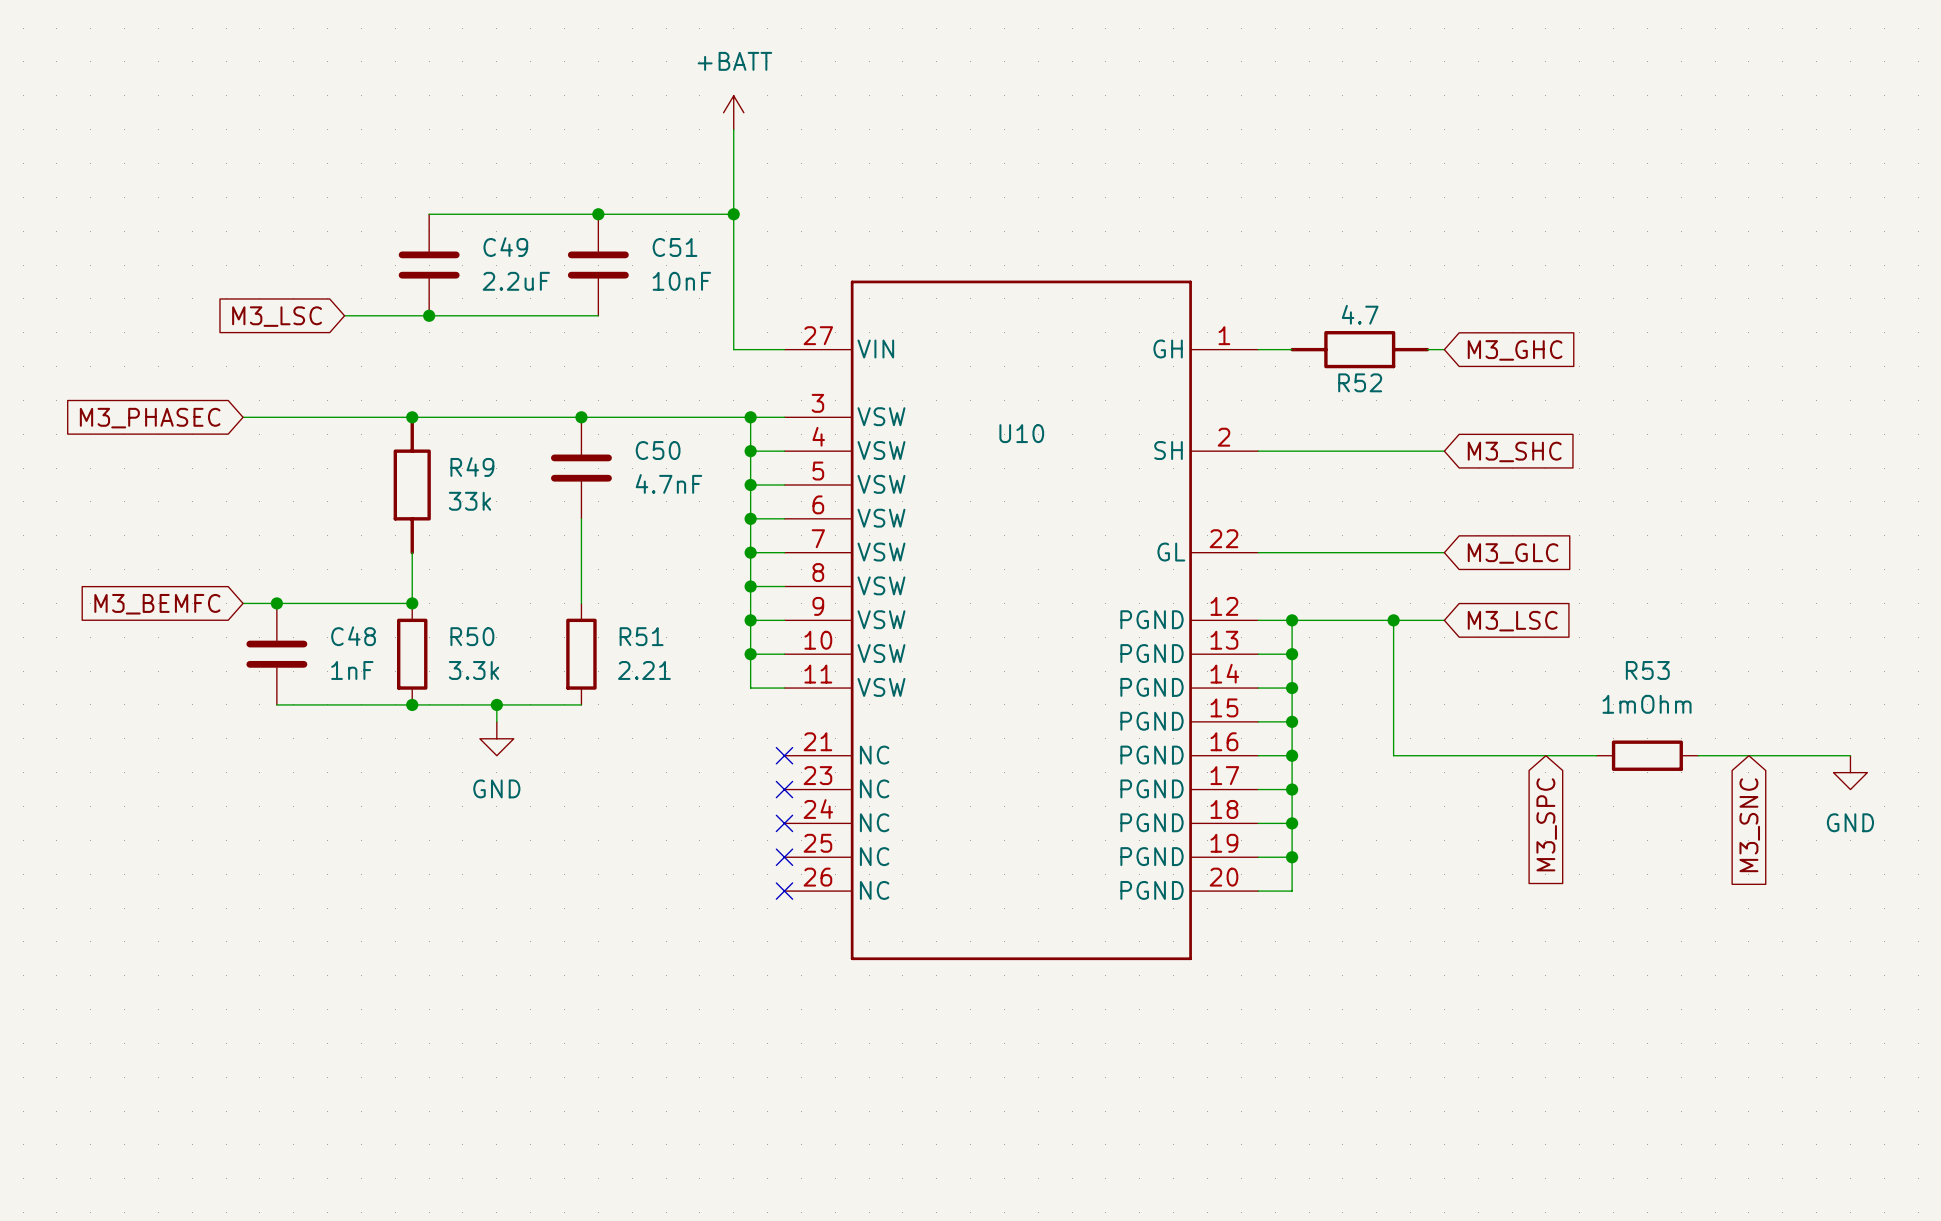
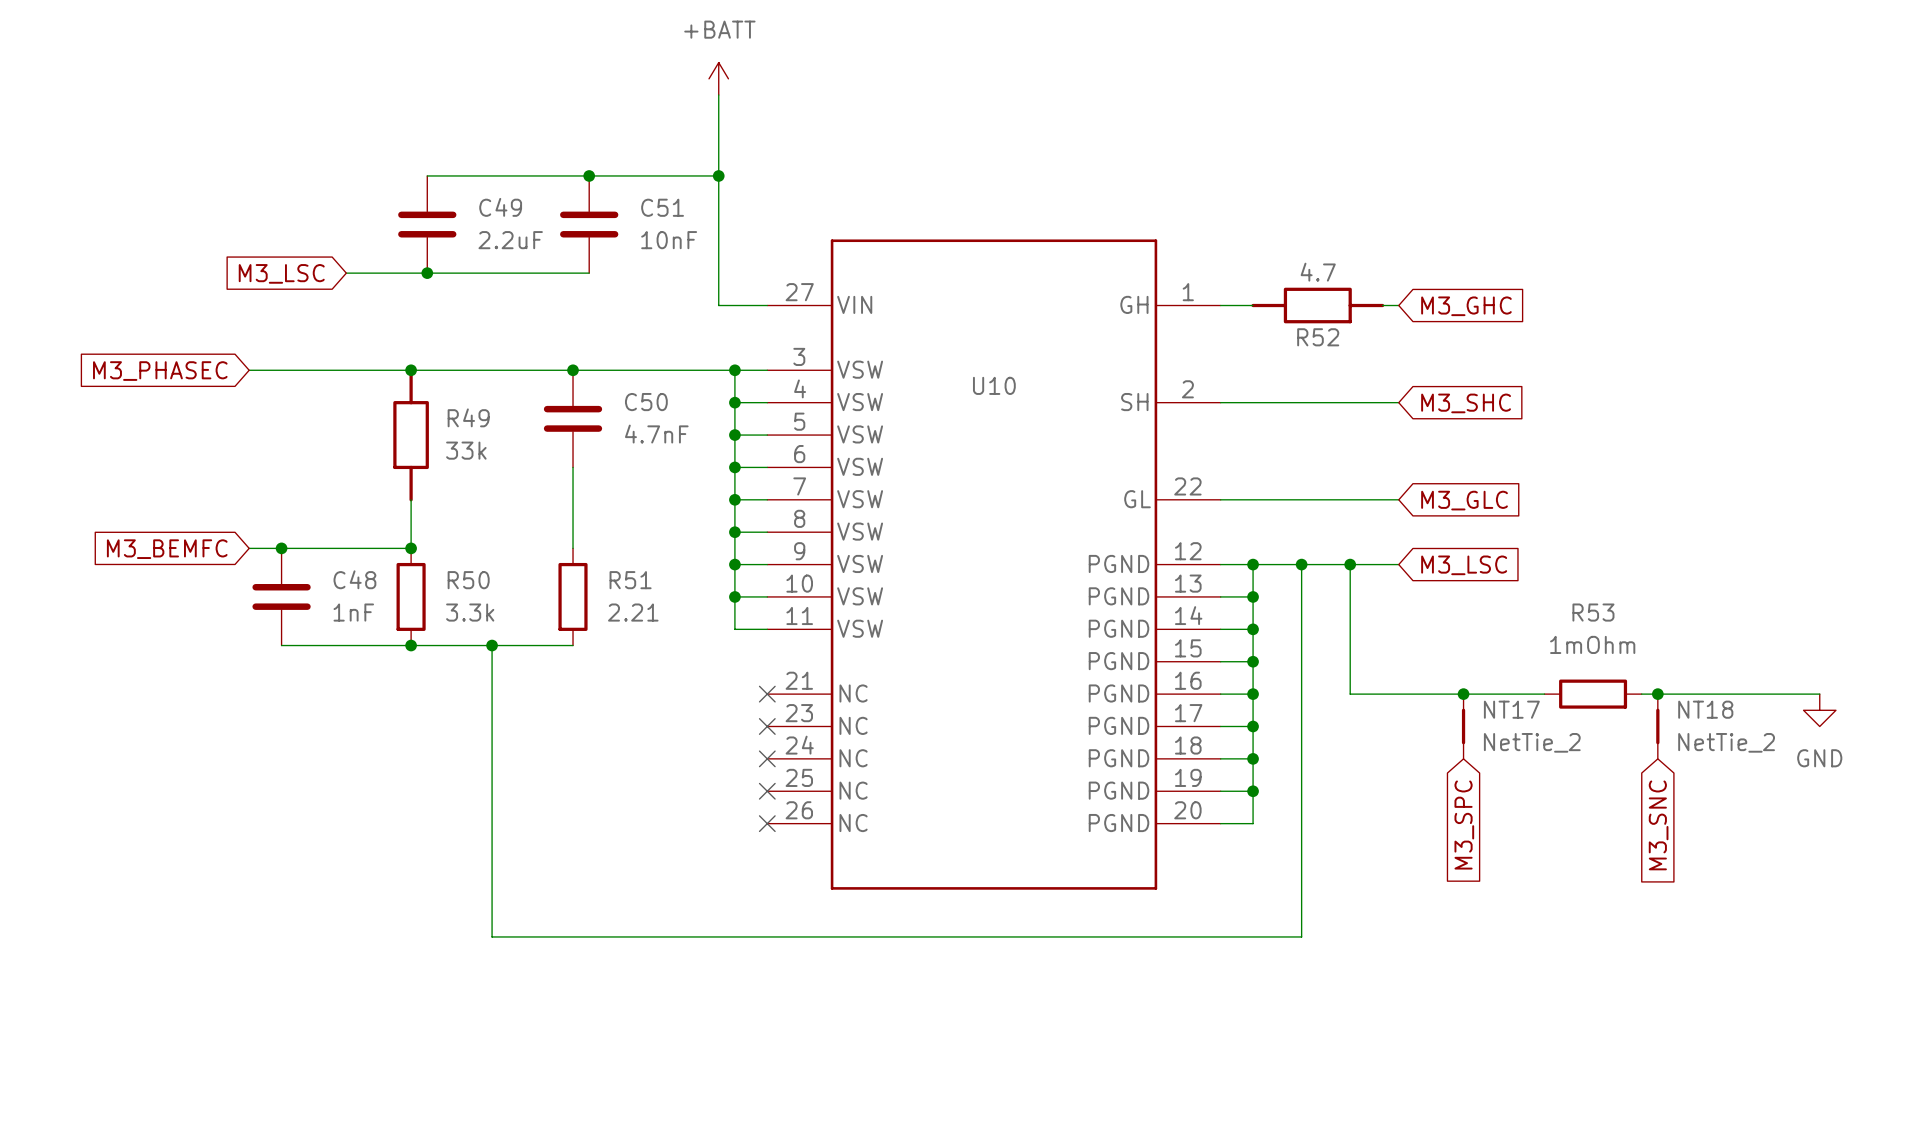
wire: none -> (1301, 564) (1301, 936) (492, 936) (492, 661)
junction: none -> (1301, 564)
power symbol: GND (496, 738) -> none
junction: none -> (1463, 694)
junction: none -> (1657, 694)
wire: none -> (1787, 694) (1819, 694)
power symbol position: GND (1850, 772) -> GND (1819, 710)
NT17: none -> NetTie_2 (1463, 726)
NT18: none -> NetTie_2 (1657, 726)
global label position: M3_SPC (1546, 824) -> M3_SPC (1464, 825)
global label position: M3_SNC (1749, 825) -> M3_SNC (1658, 825)

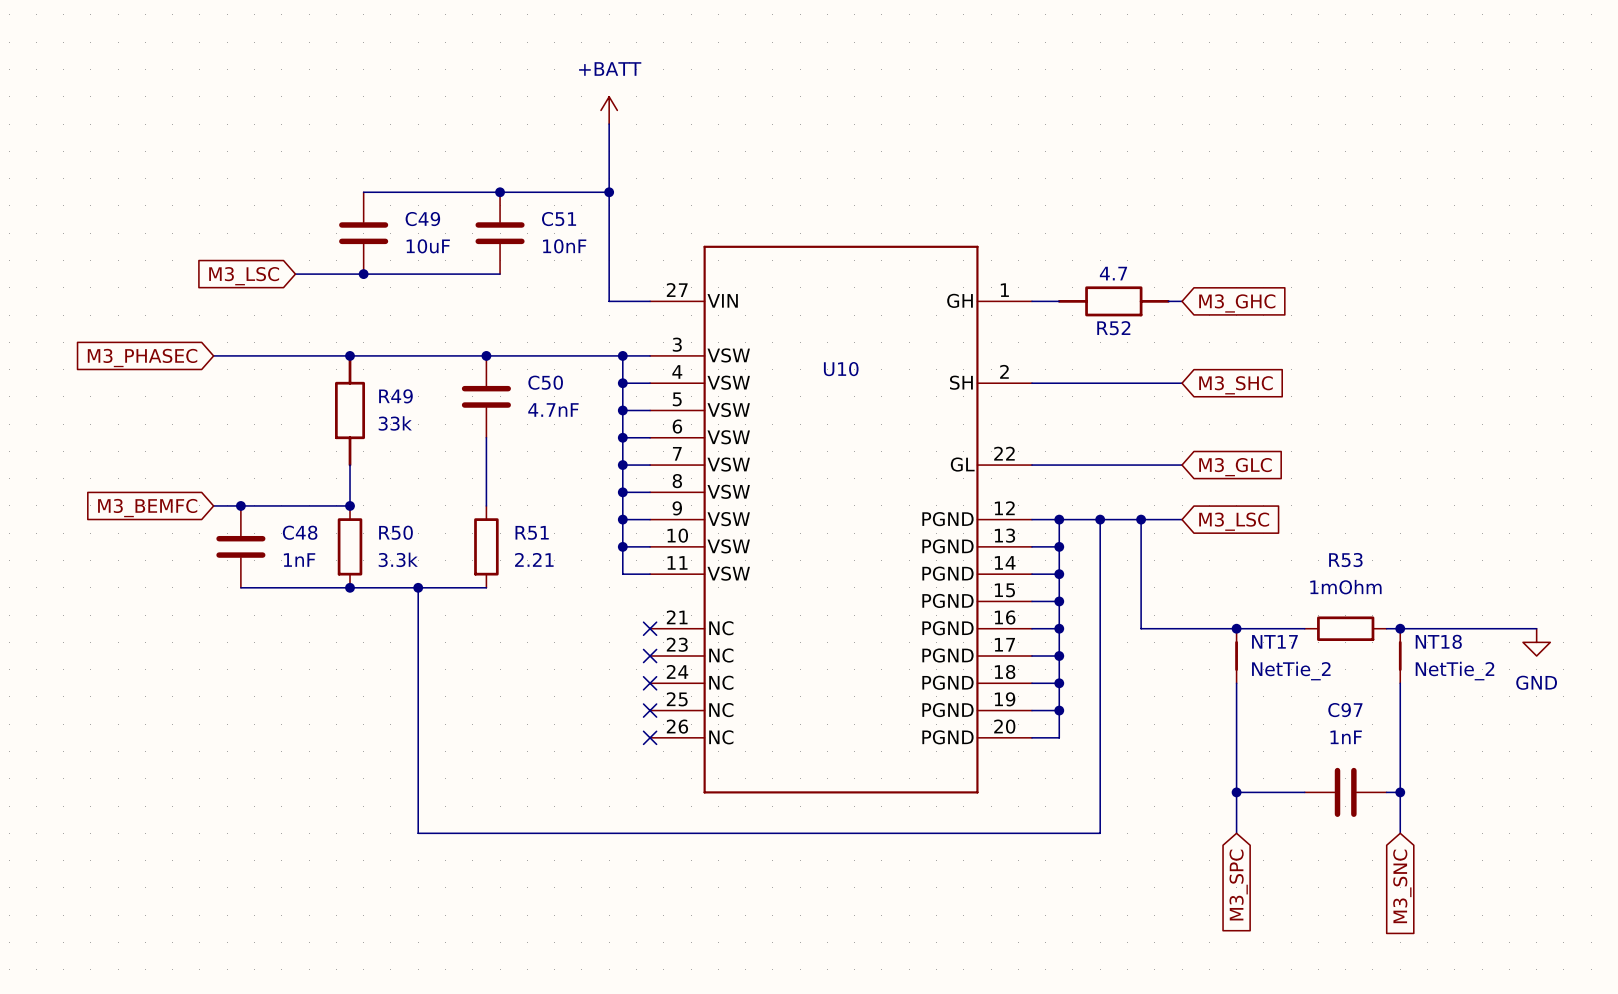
C49 value: 2.2uF (510, 240) -> 10uF (428, 246)
wire: none -> (1236, 683) (1236, 833)
wire: none -> (1400, 683) (1400, 833)
global label position: M3_SPC (1464, 825) -> M3_SPC (1238, 885)
global label position: M3_SNC (1658, 825) -> M3_SNC (1402, 886)
wire: none -> (1236, 792) (1304, 792)
junction: none -> (1236, 792)
C97: none -> 1nF (1345, 792)
wire: none -> (1386, 792) (1400, 792)
junction: none -> (1400, 792)

